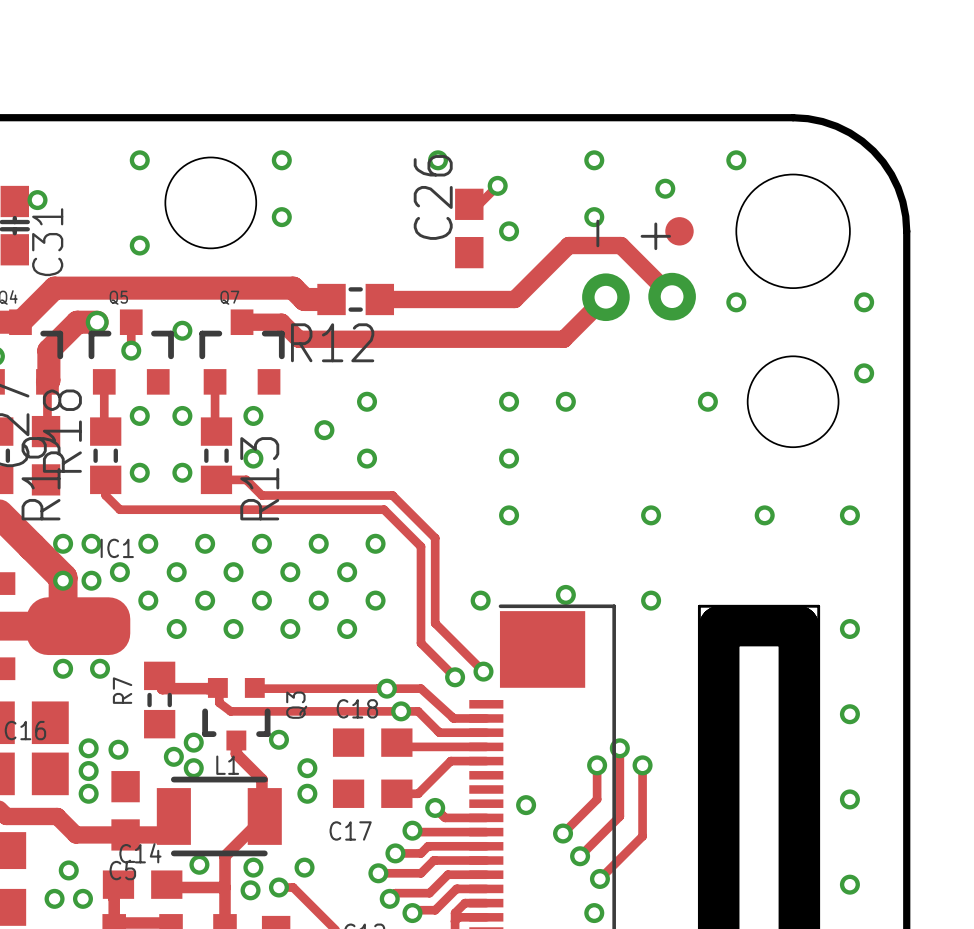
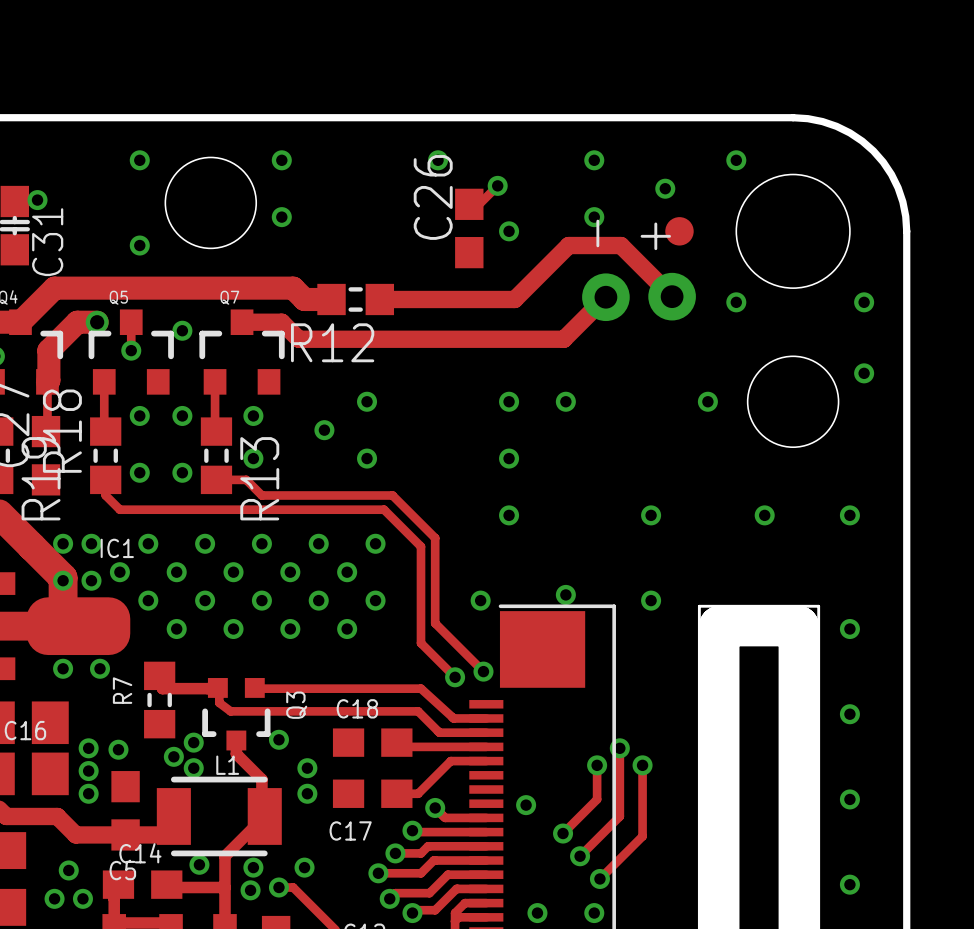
via: (386, 688) -> none
via: (401, 711) -> none
via: none -> (537, 913)

